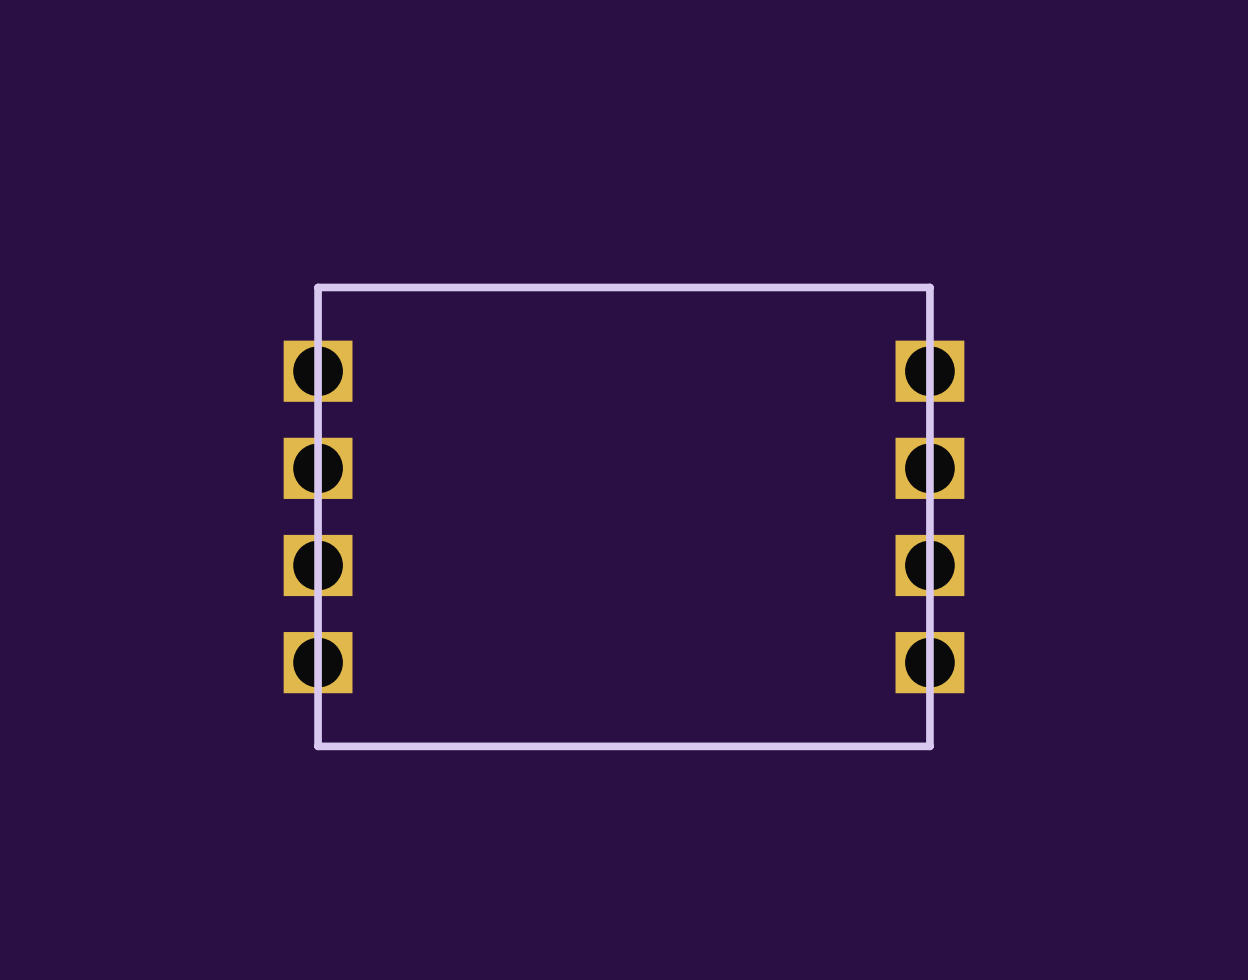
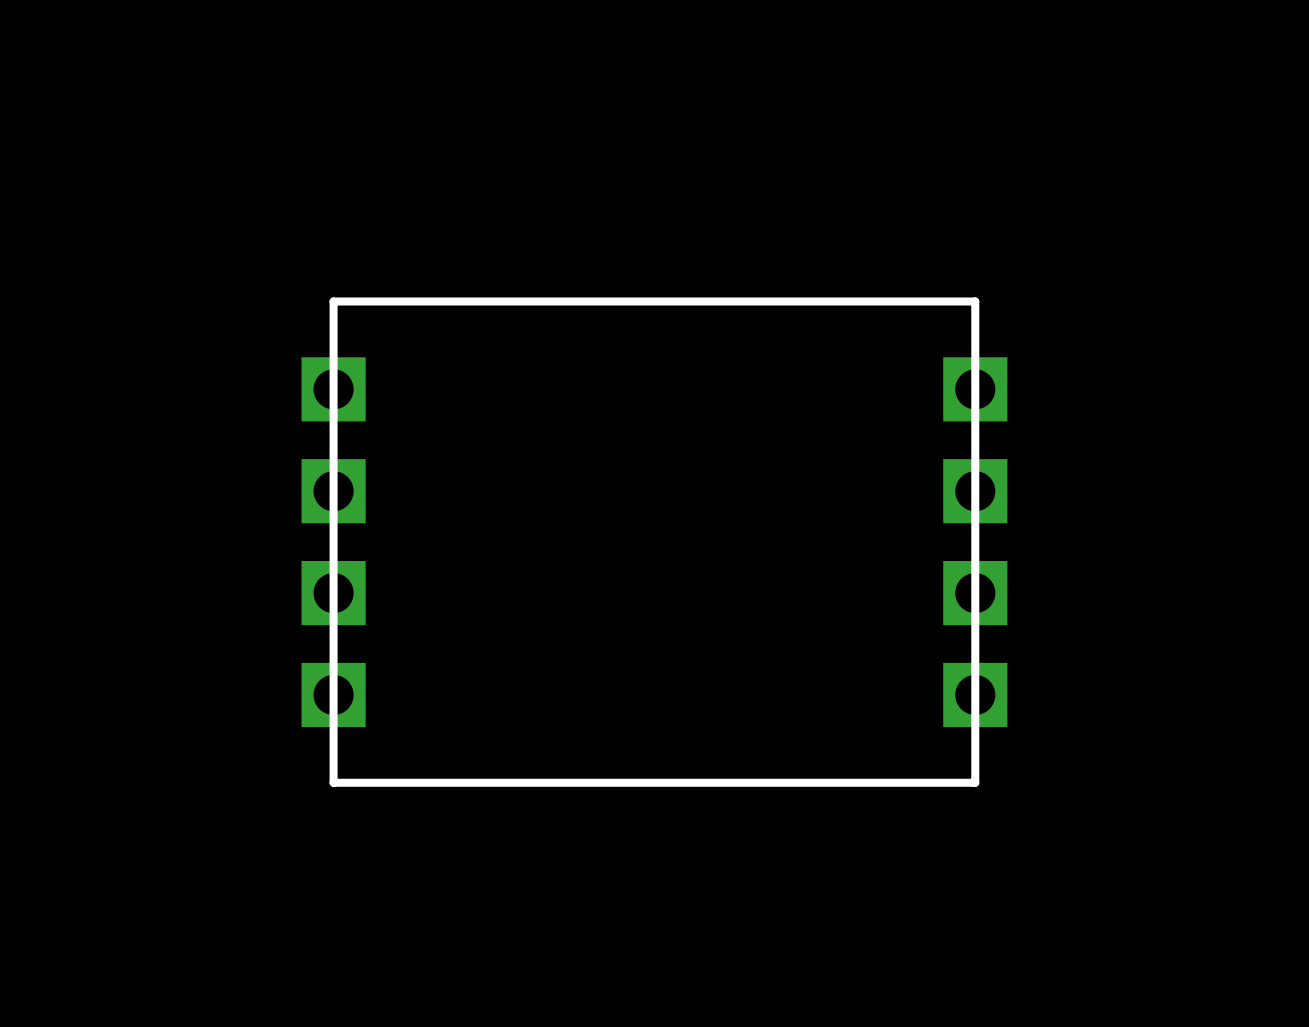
part footprint: [283, 340, 353, 402] -> [301, 357, 366, 422]
part footprint: [895, 340, 965, 402] -> [943, 357, 1008, 422]
part footprint: [283, 437, 353, 499] -> [301, 459, 366, 524]
part footprint: [895, 437, 965, 499] -> [943, 459, 1008, 524]
part footprint: [283, 534, 353, 597] -> [301, 560, 366, 626]
part footprint: [895, 534, 965, 597] -> [943, 560, 1008, 626]
part footprint: [283, 632, 353, 694] -> [301, 662, 366, 728]
part footprint: [895, 632, 965, 694] -> [943, 662, 1008, 728]

